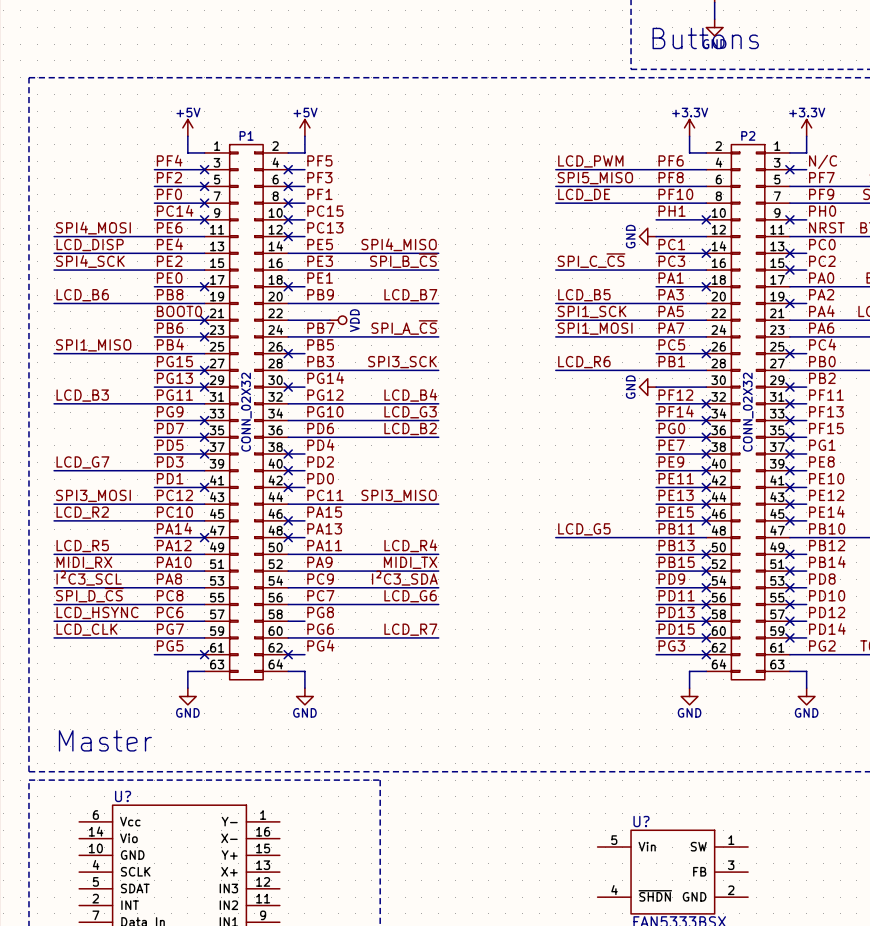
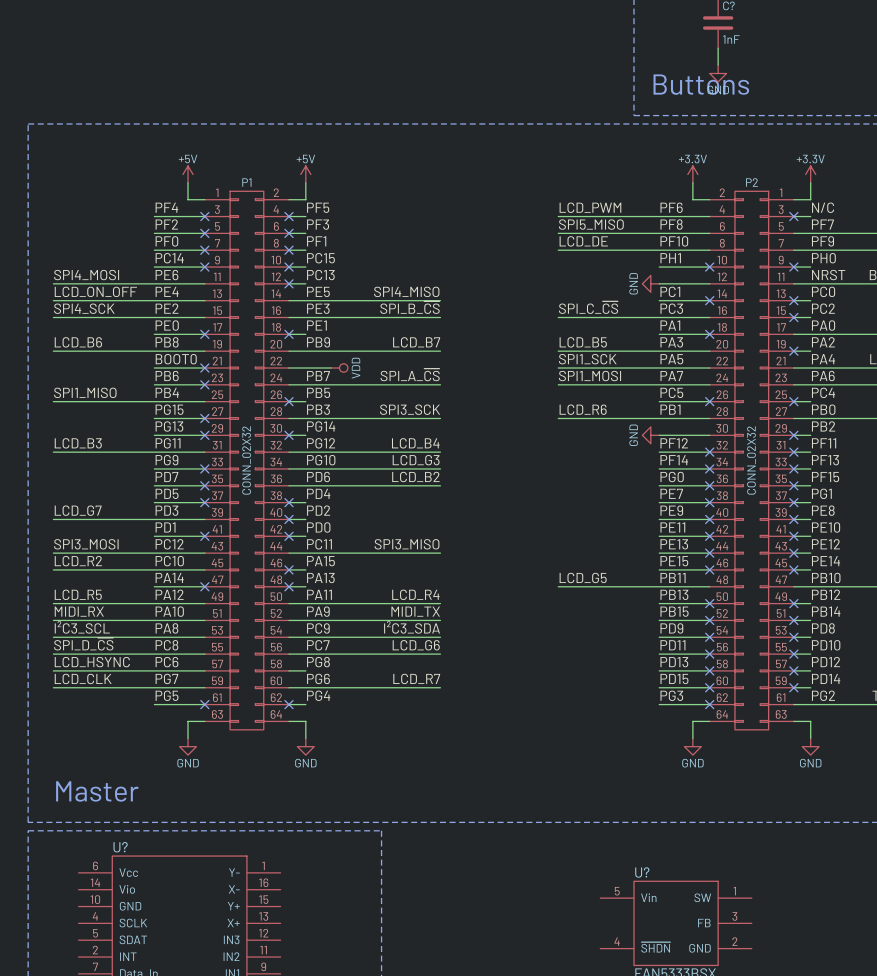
label: LCD_DISP (90, 245) -> LCD_ON_OFF (95, 291)

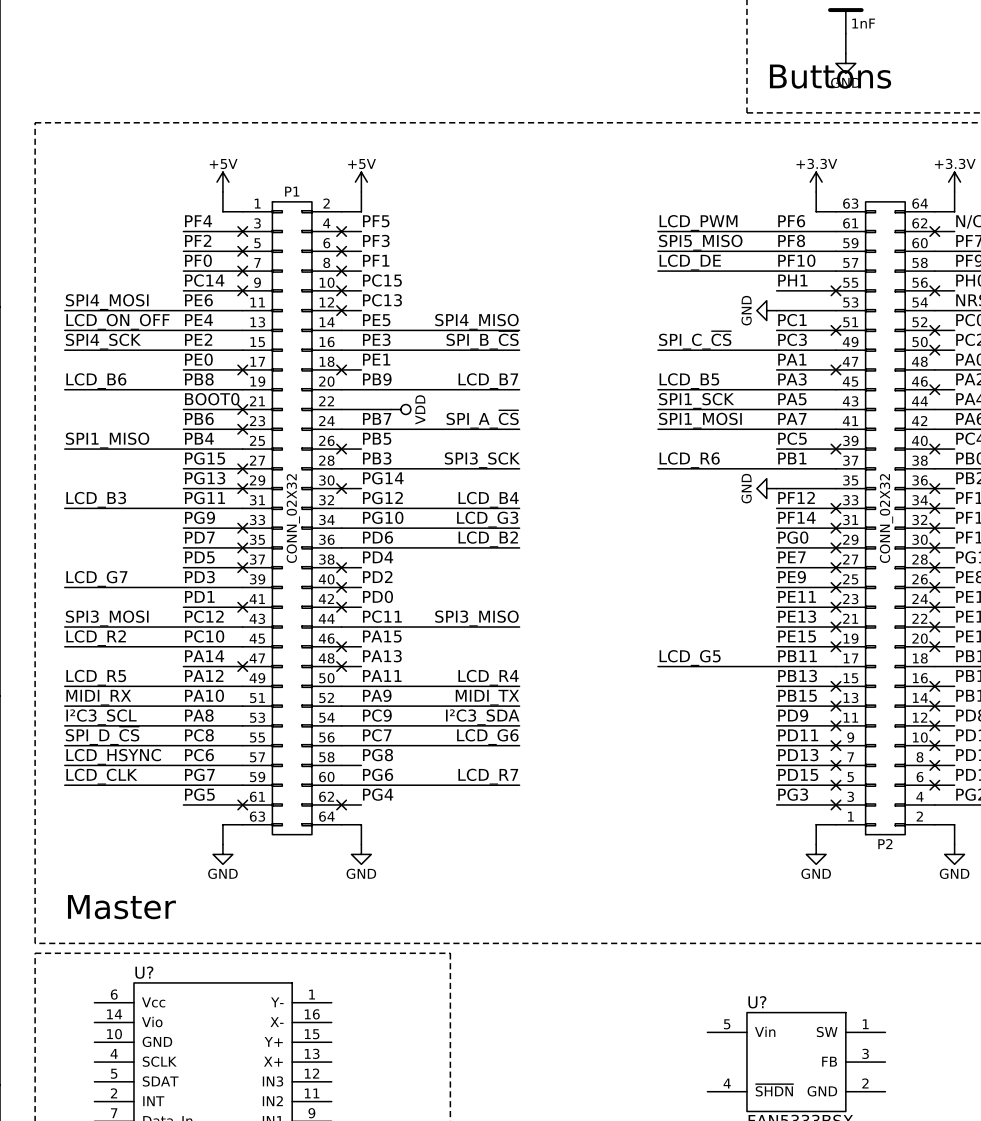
P2 rotation: 0° (751, 460) -> 180° (885, 518)

